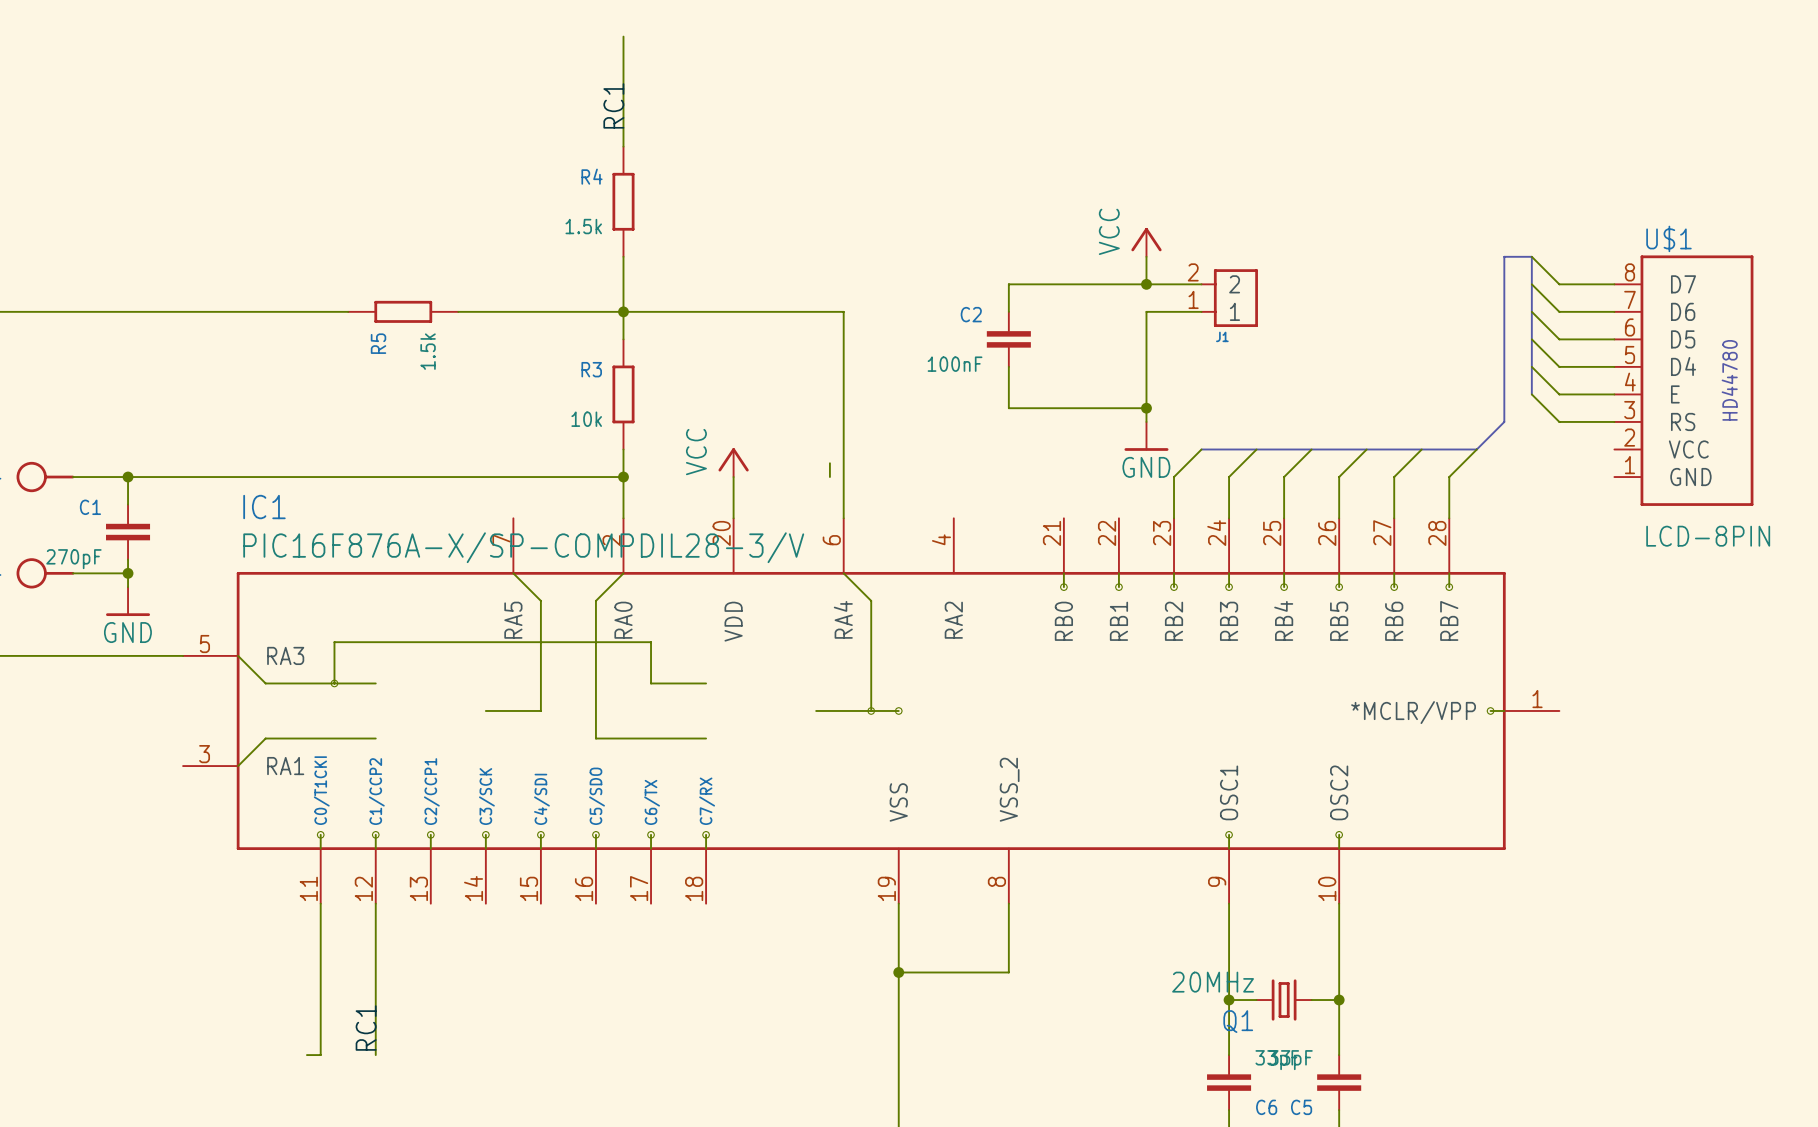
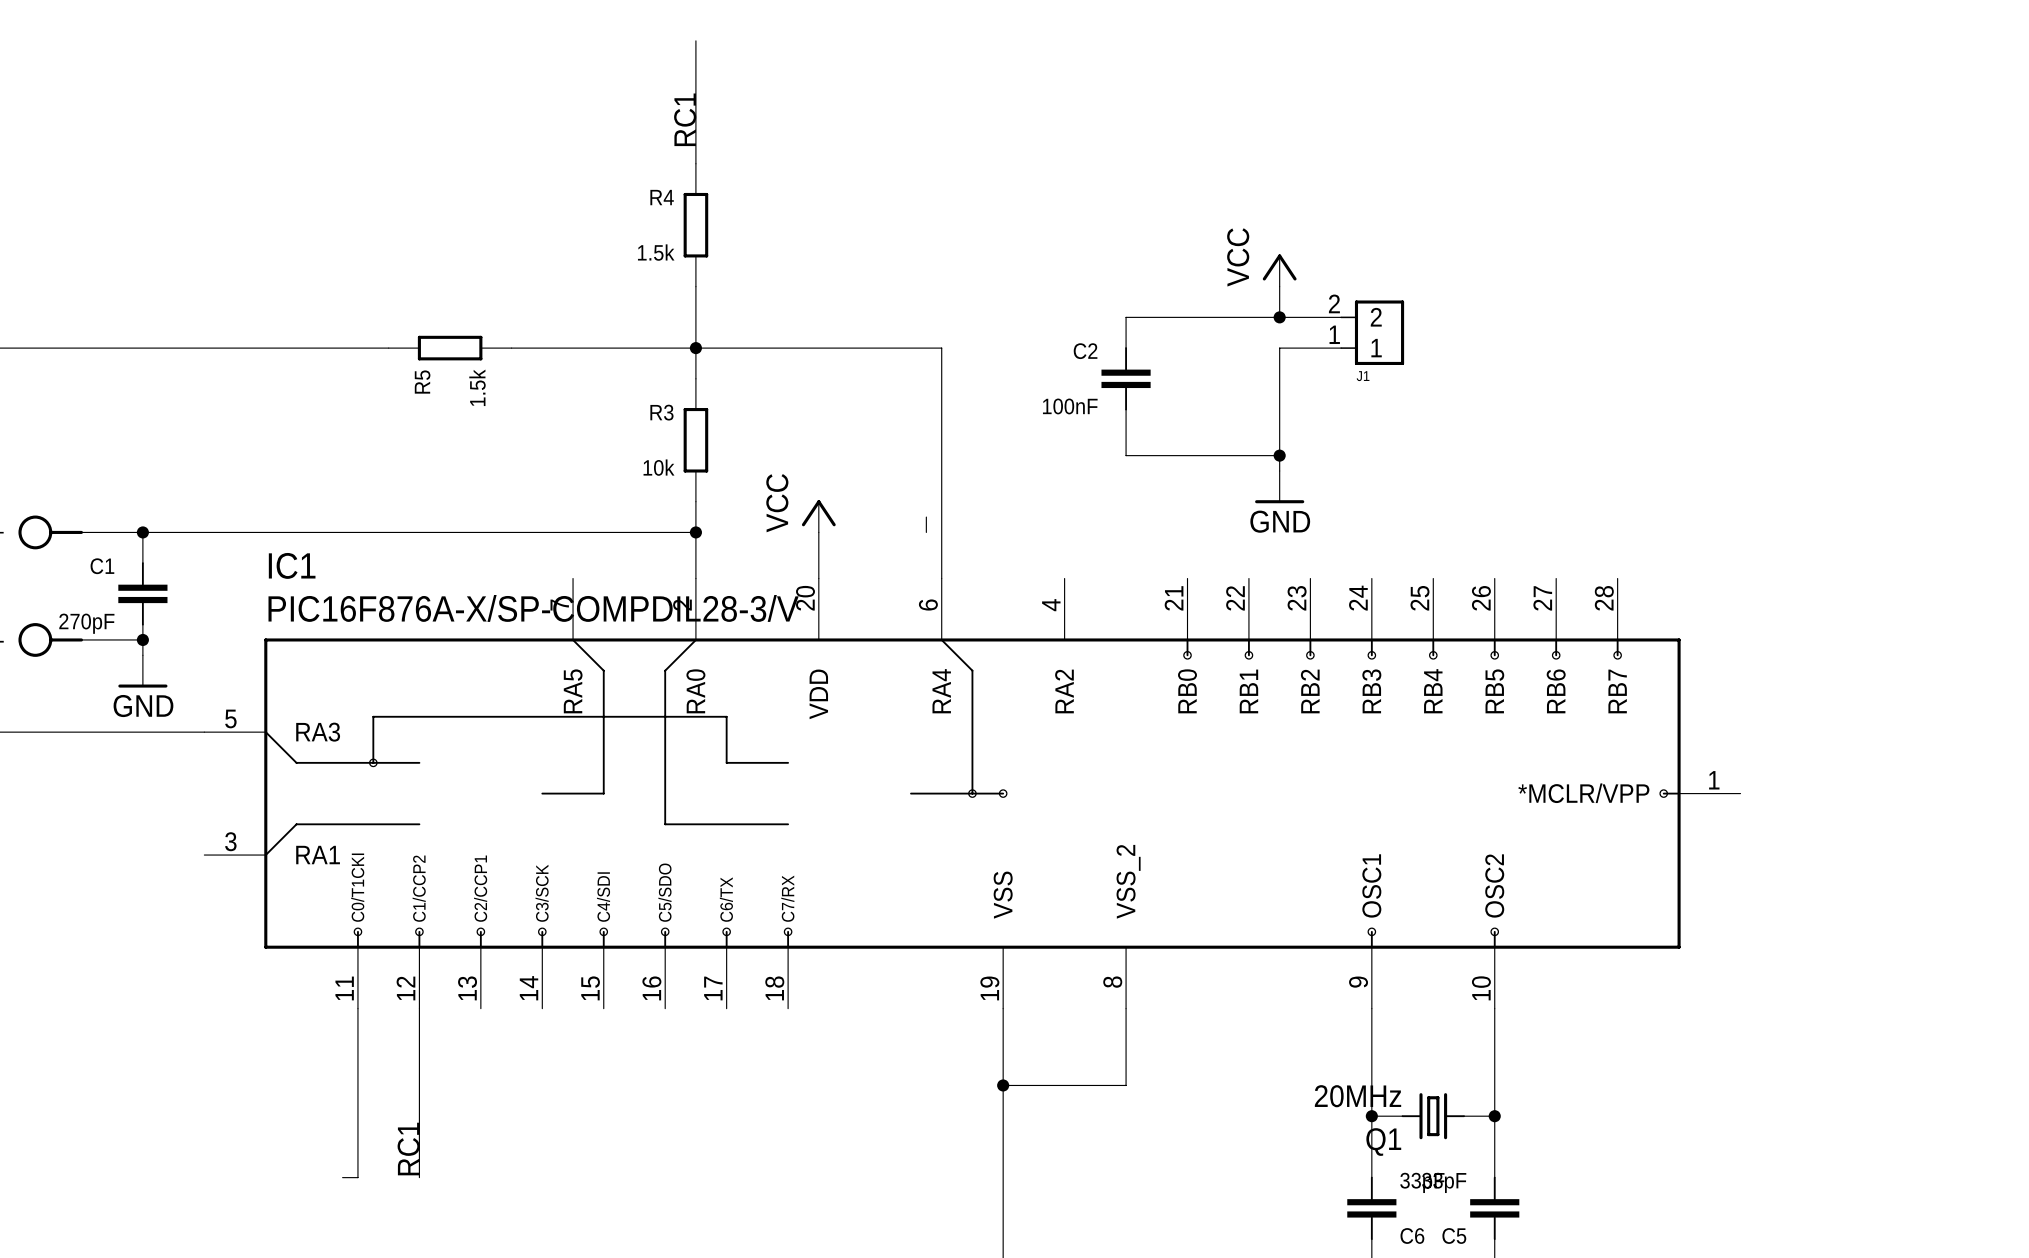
wire: (1531, 256) (1559, 284) (1614, 284) -> none
wire: (1531, 284) (1559, 311) (1614, 311) -> none
wire: (1531, 311) (1559, 339) (1614, 339) -> none
wire: (1531, 339) (1559, 366) (1614, 366) -> none
wire: (1531, 366) (1559, 394) (1614, 394) -> none
U$1: LCD-8PIN (1683, 380) -> none
bus: (1531, 394) (1531, 256) (1504, 256) (1504, 421) (1476, 449) (1201, 449) -> none
wire: (1531, 394) (1559, 421) (1614, 421) -> none
wire: (1201, 449) (1174, 477) (1174, 518) -> none
wire: (1256, 449) (1229, 477) (1229, 518) -> none
wire: (1311, 449) (1284, 477) (1284, 518) -> none
wire: (1366, 449) (1339, 477) (1339, 518) -> none
wire: (1421, 449) (1394, 477) (1394, 518) -> none
wire: (1476, 449) (1449, 477) (1449, 518) -> none

